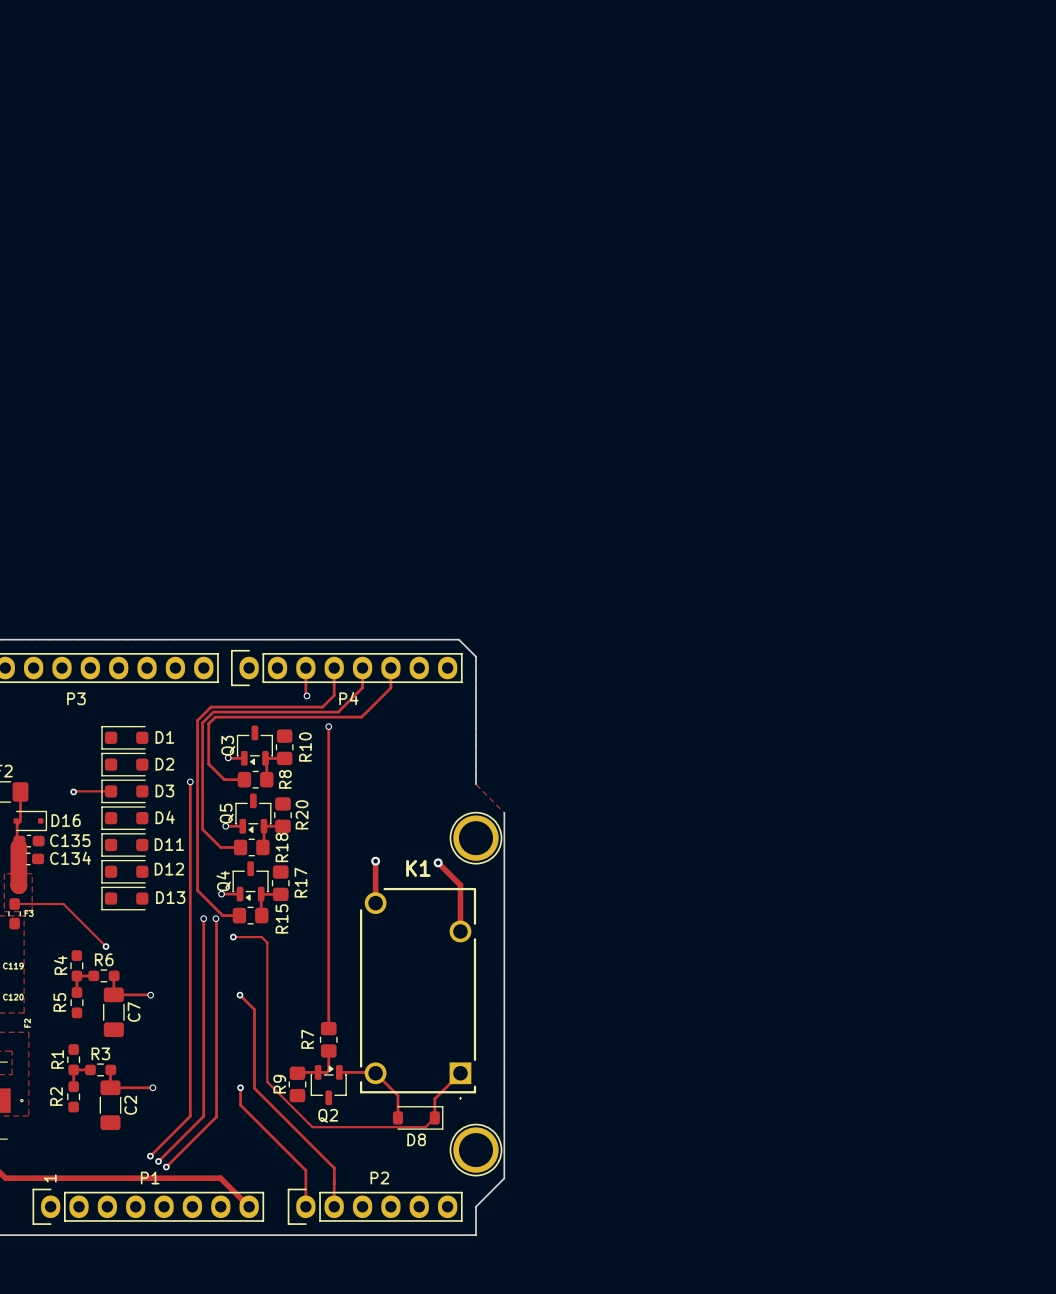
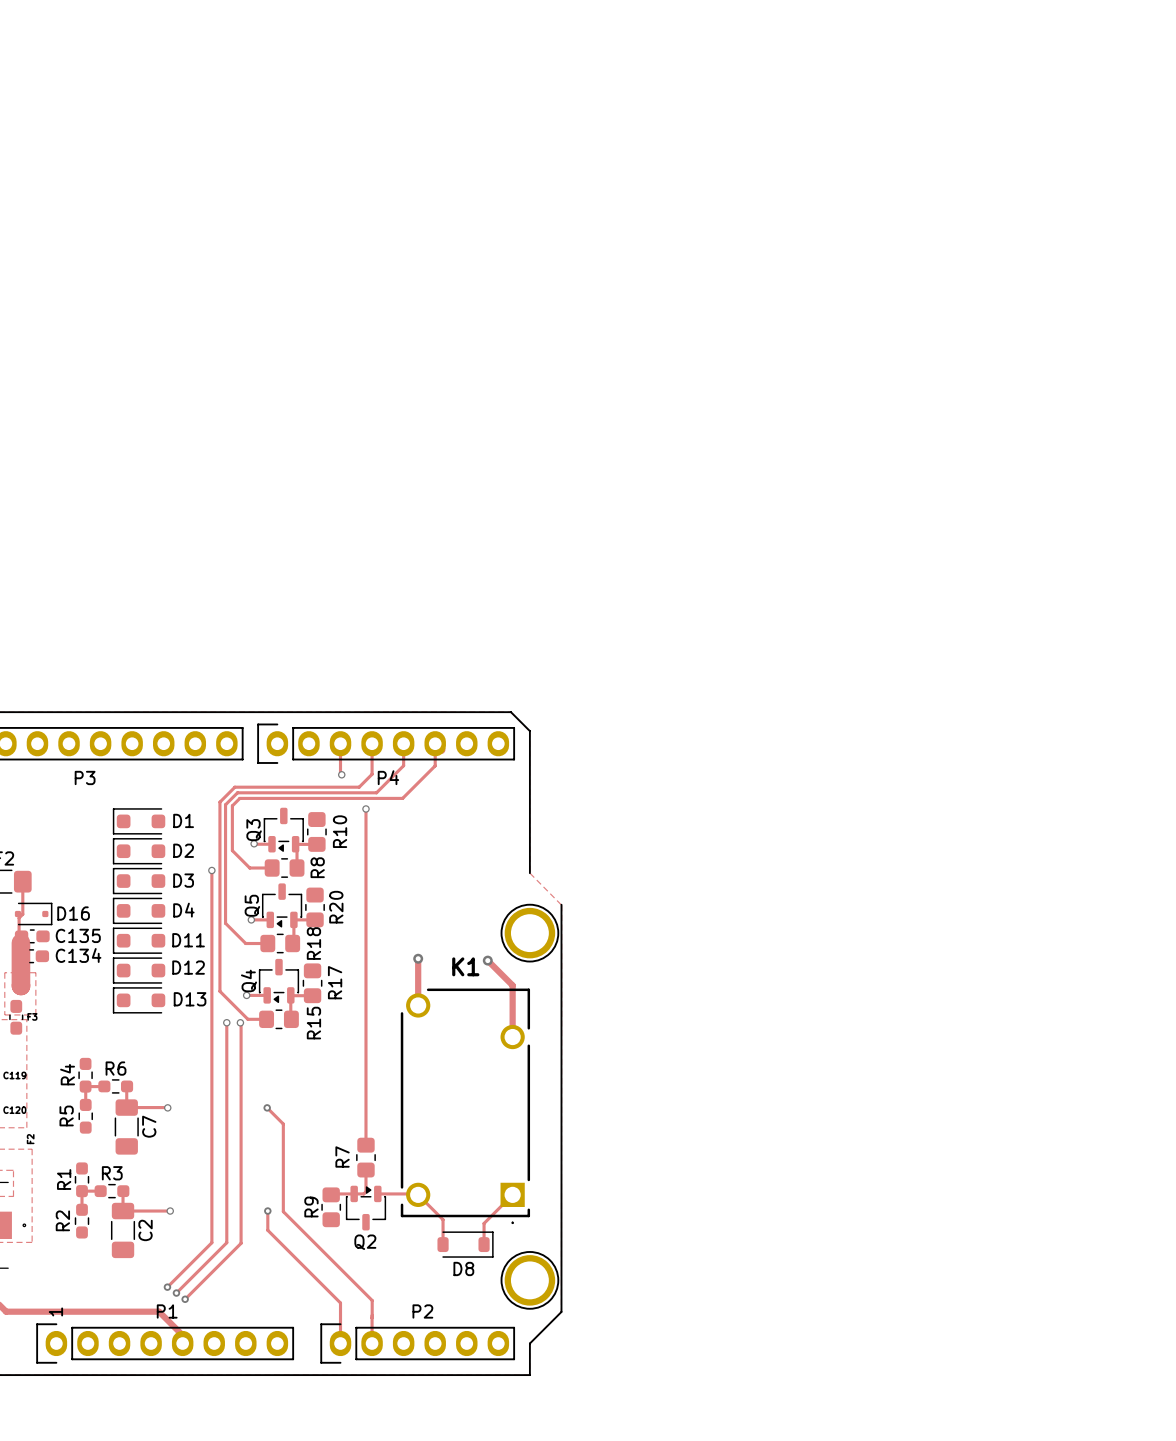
via: (73, 791) -> none
track: (111, 791) (73, 791) -> none
track: (14, 904) (63, 904) (106, 946) -> none
track: (233, 937) (261, 937) (267, 942) (267, 1082) (312, 1127) (425, 1127) (434, 1117) -> none
via: (233, 937) -> none
via: (106, 946) -> none
track: (142, 1178) (220, 1178) (249, 1206) -> (159, 1311) (182, 1335)

